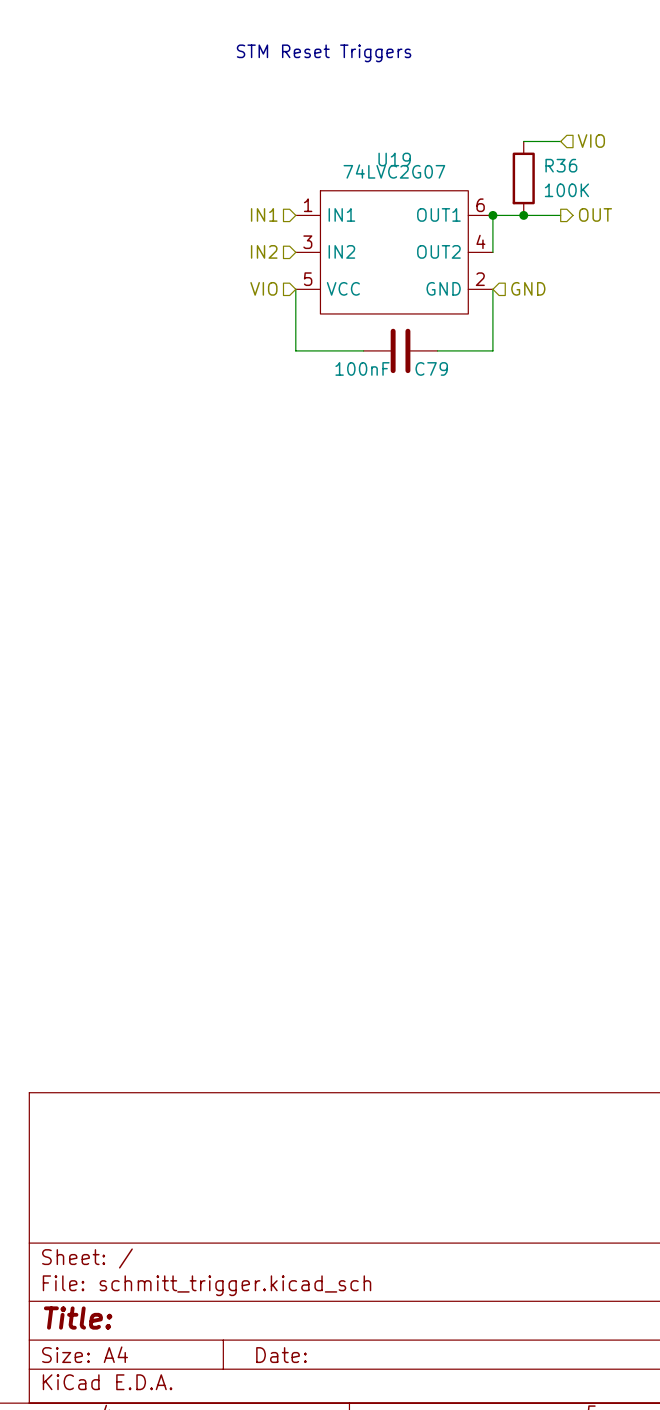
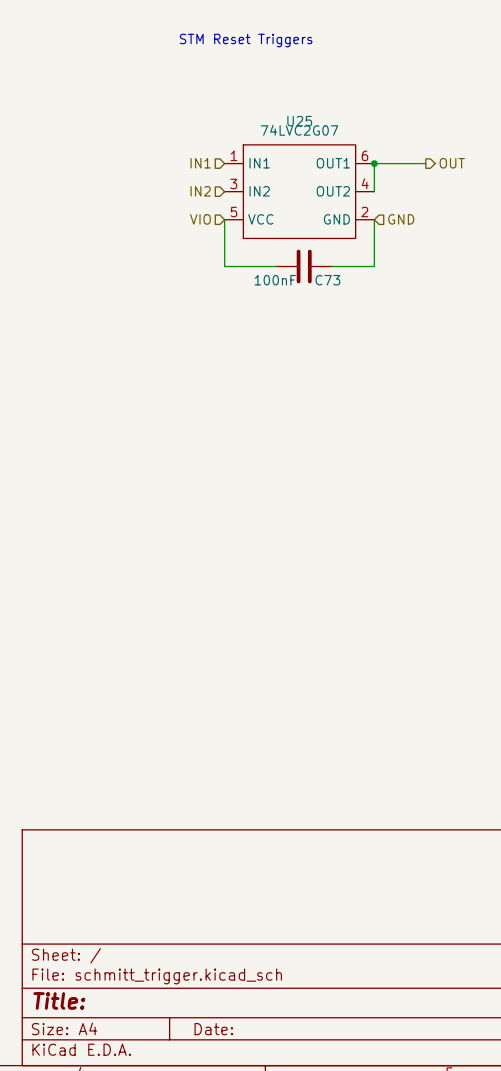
wire: (523, 141) (560, 141) -> none
hierarchical label: VIO (591, 141) -> none
U19 name: U19 (394, 159) -> U25 (299, 121)
R36: 100K (523, 178) -> none
junction: (523, 215) -> none
C79 name: C79 (431, 368) -> C73 (327, 280)

